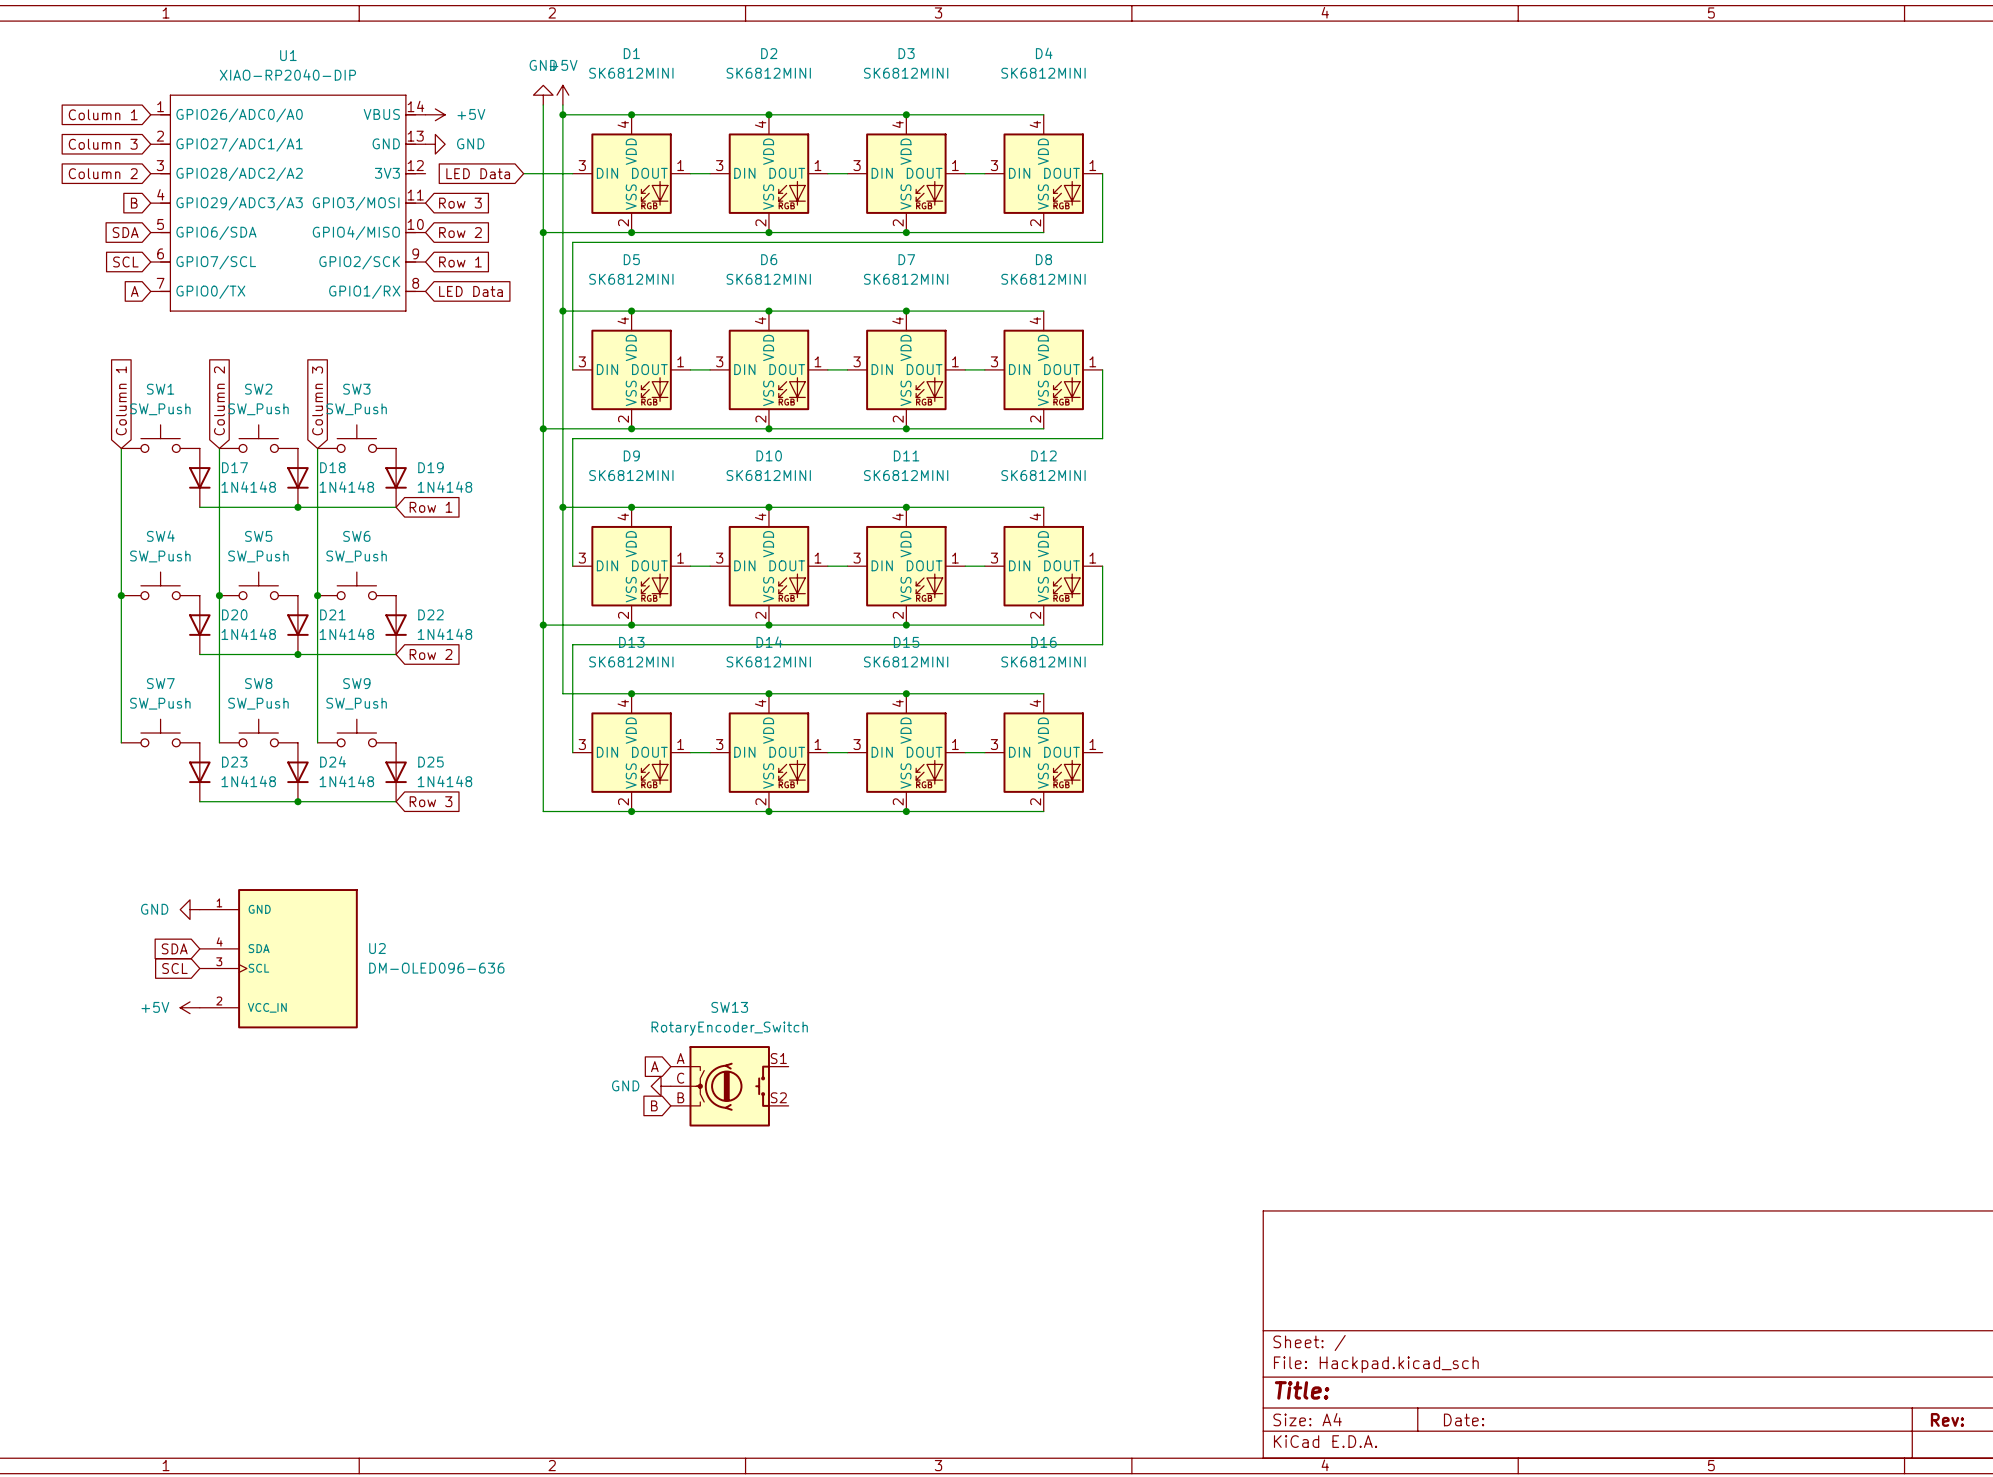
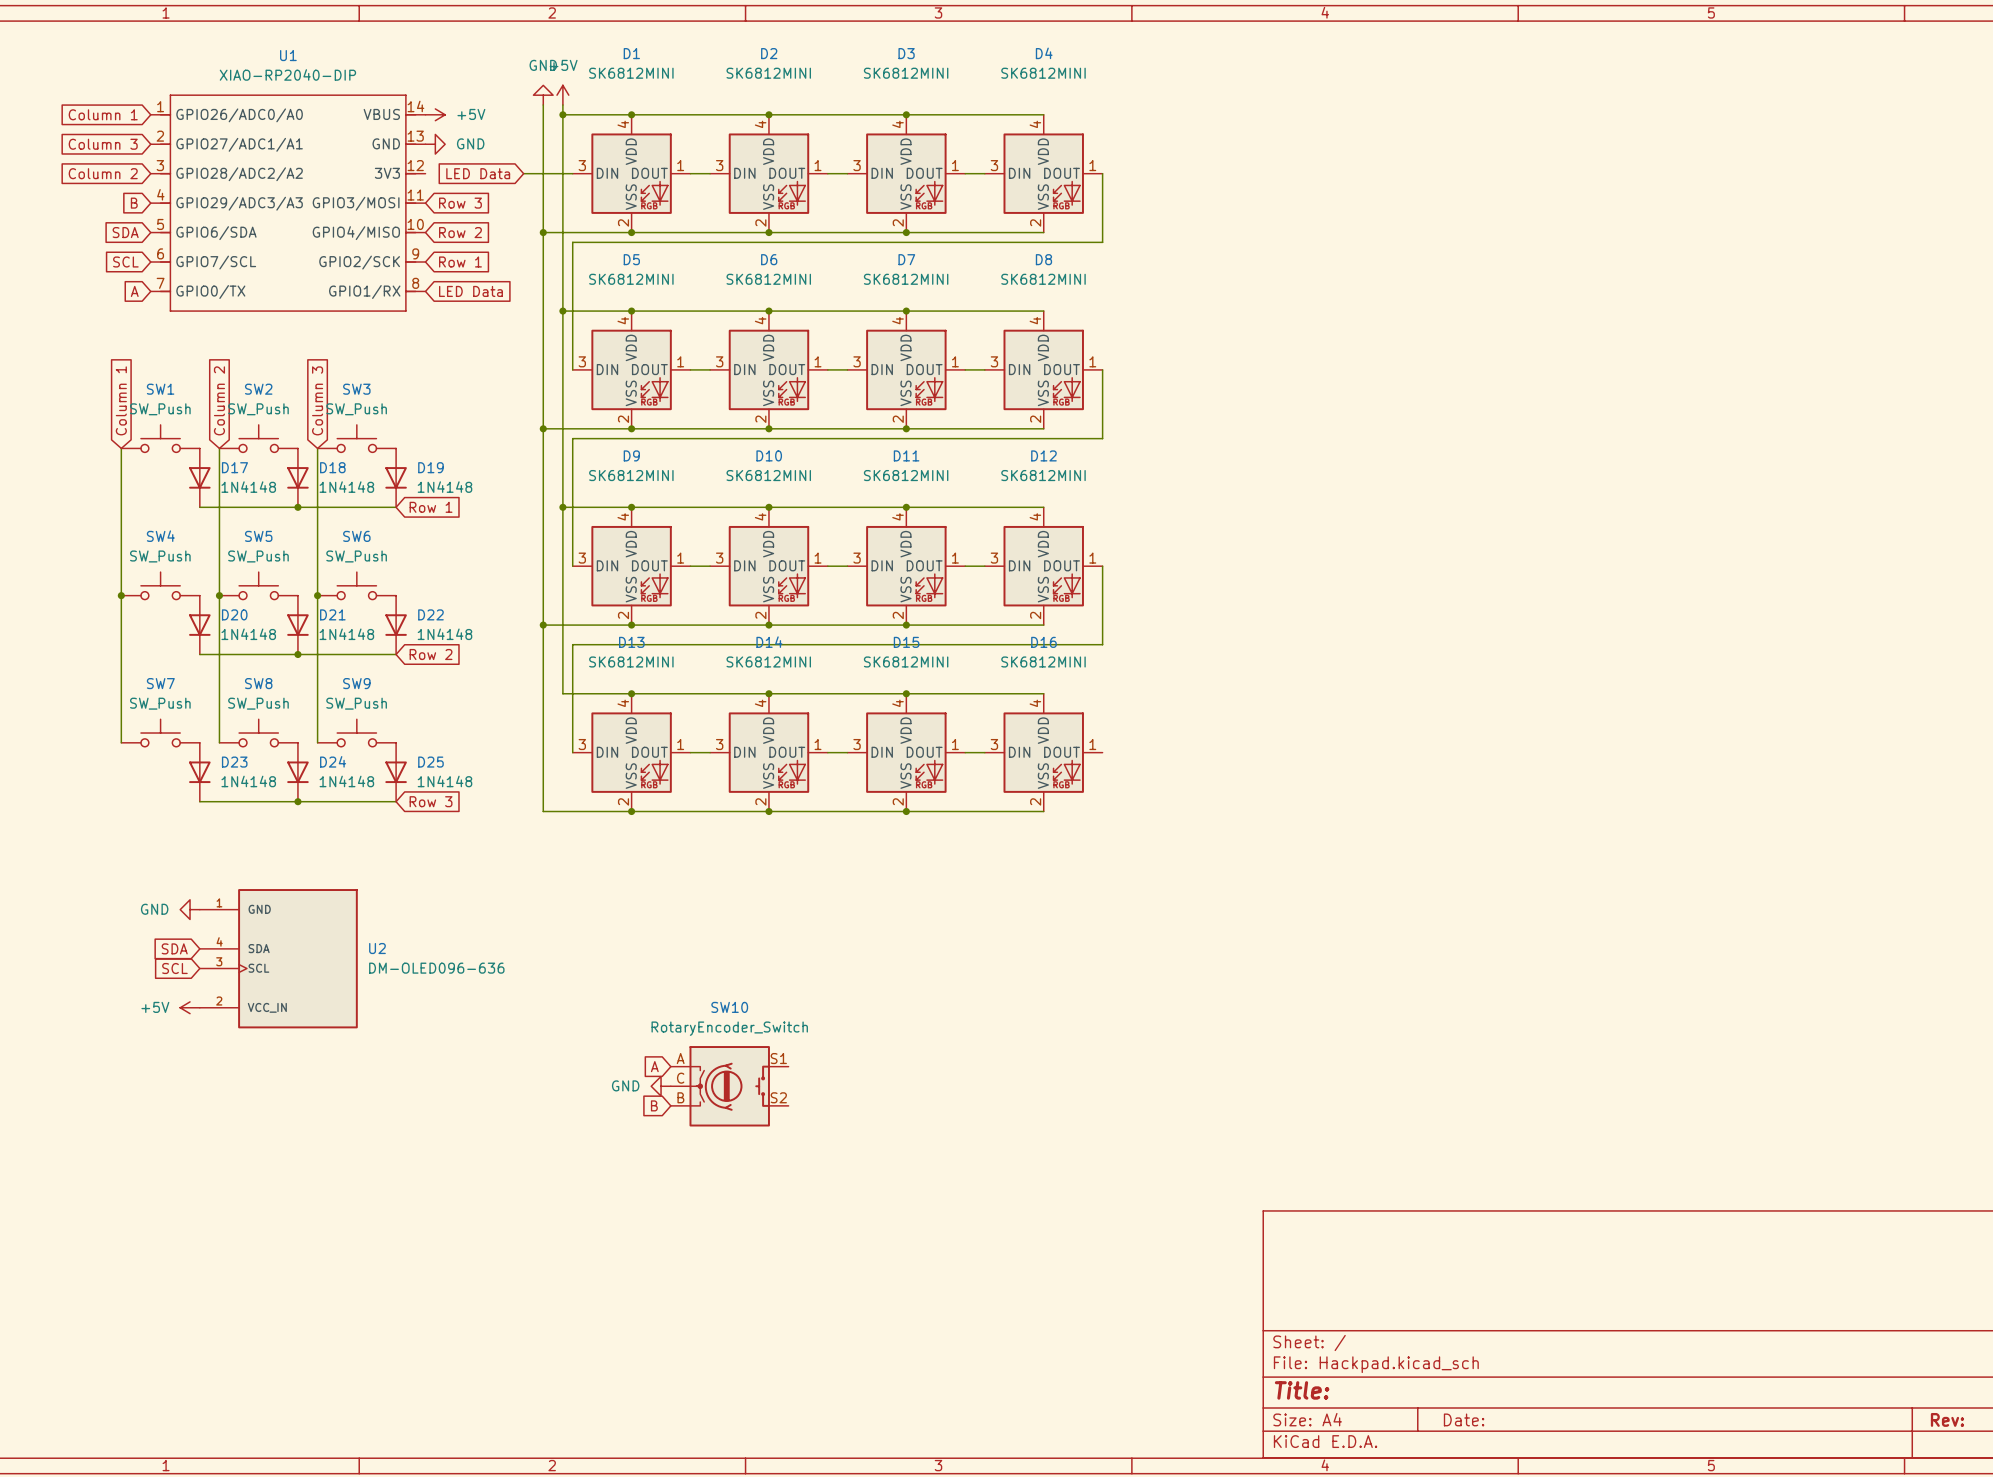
SW13 name: SW13 (729, 1007) -> SW10 (729, 1007)

